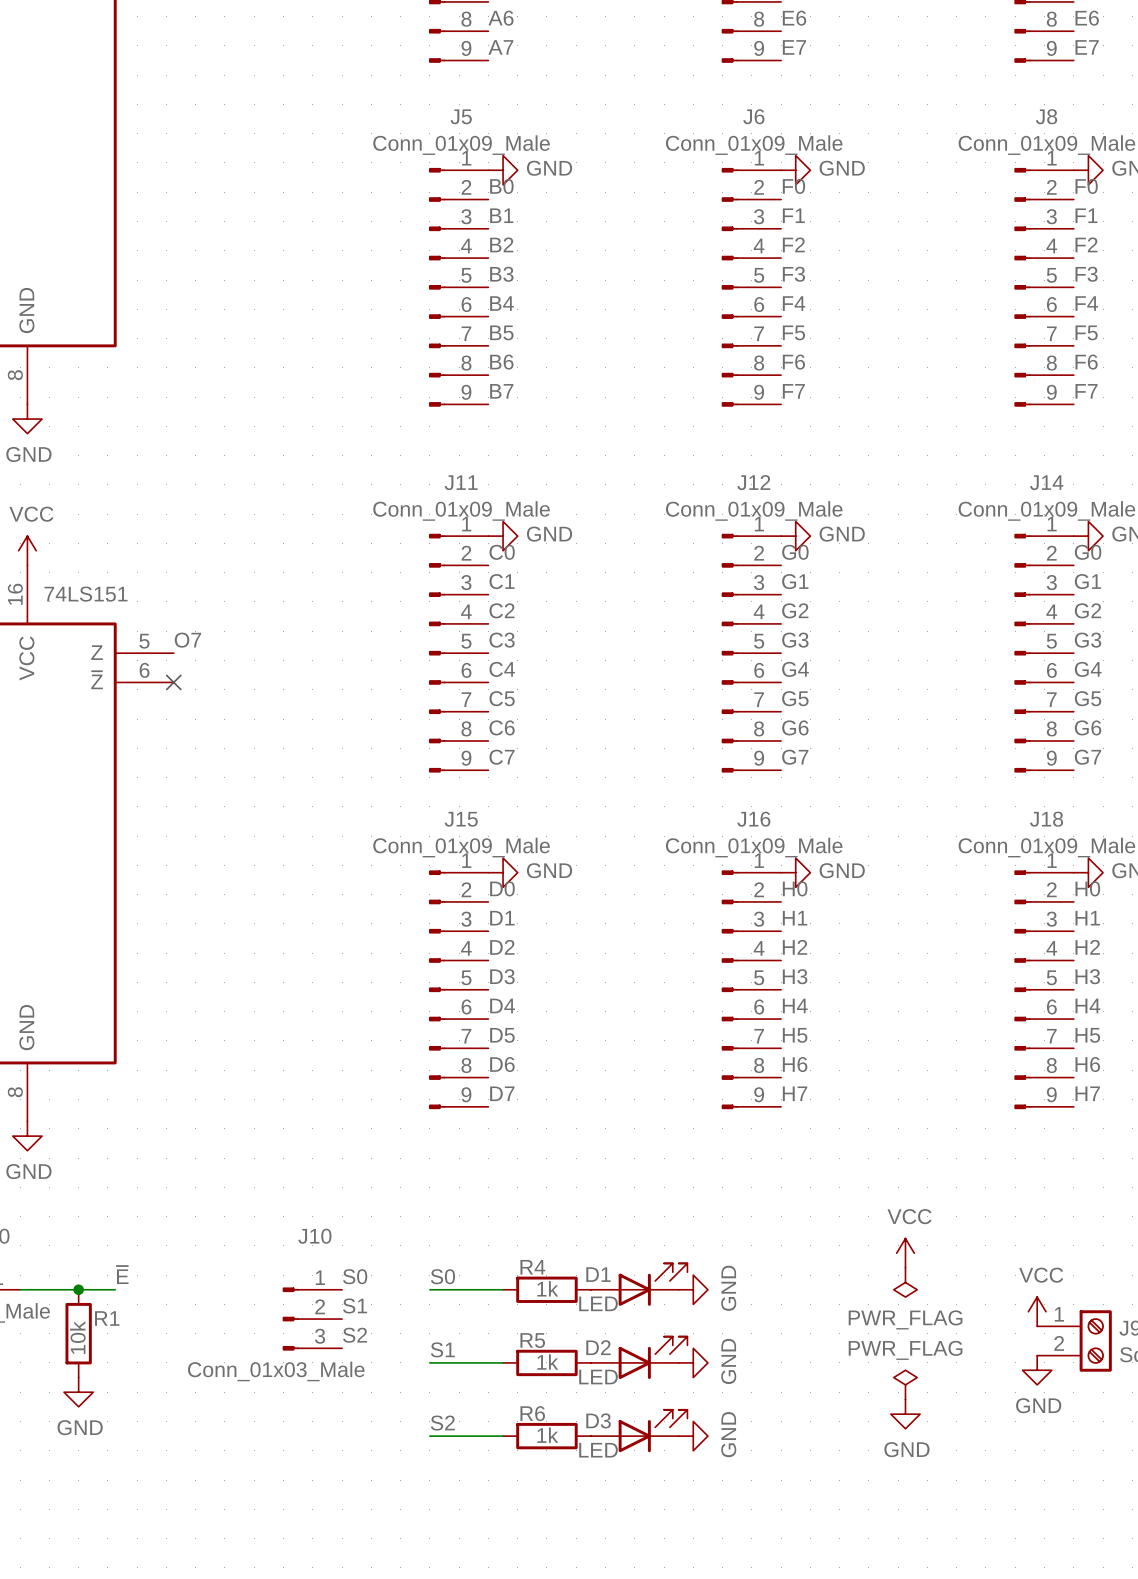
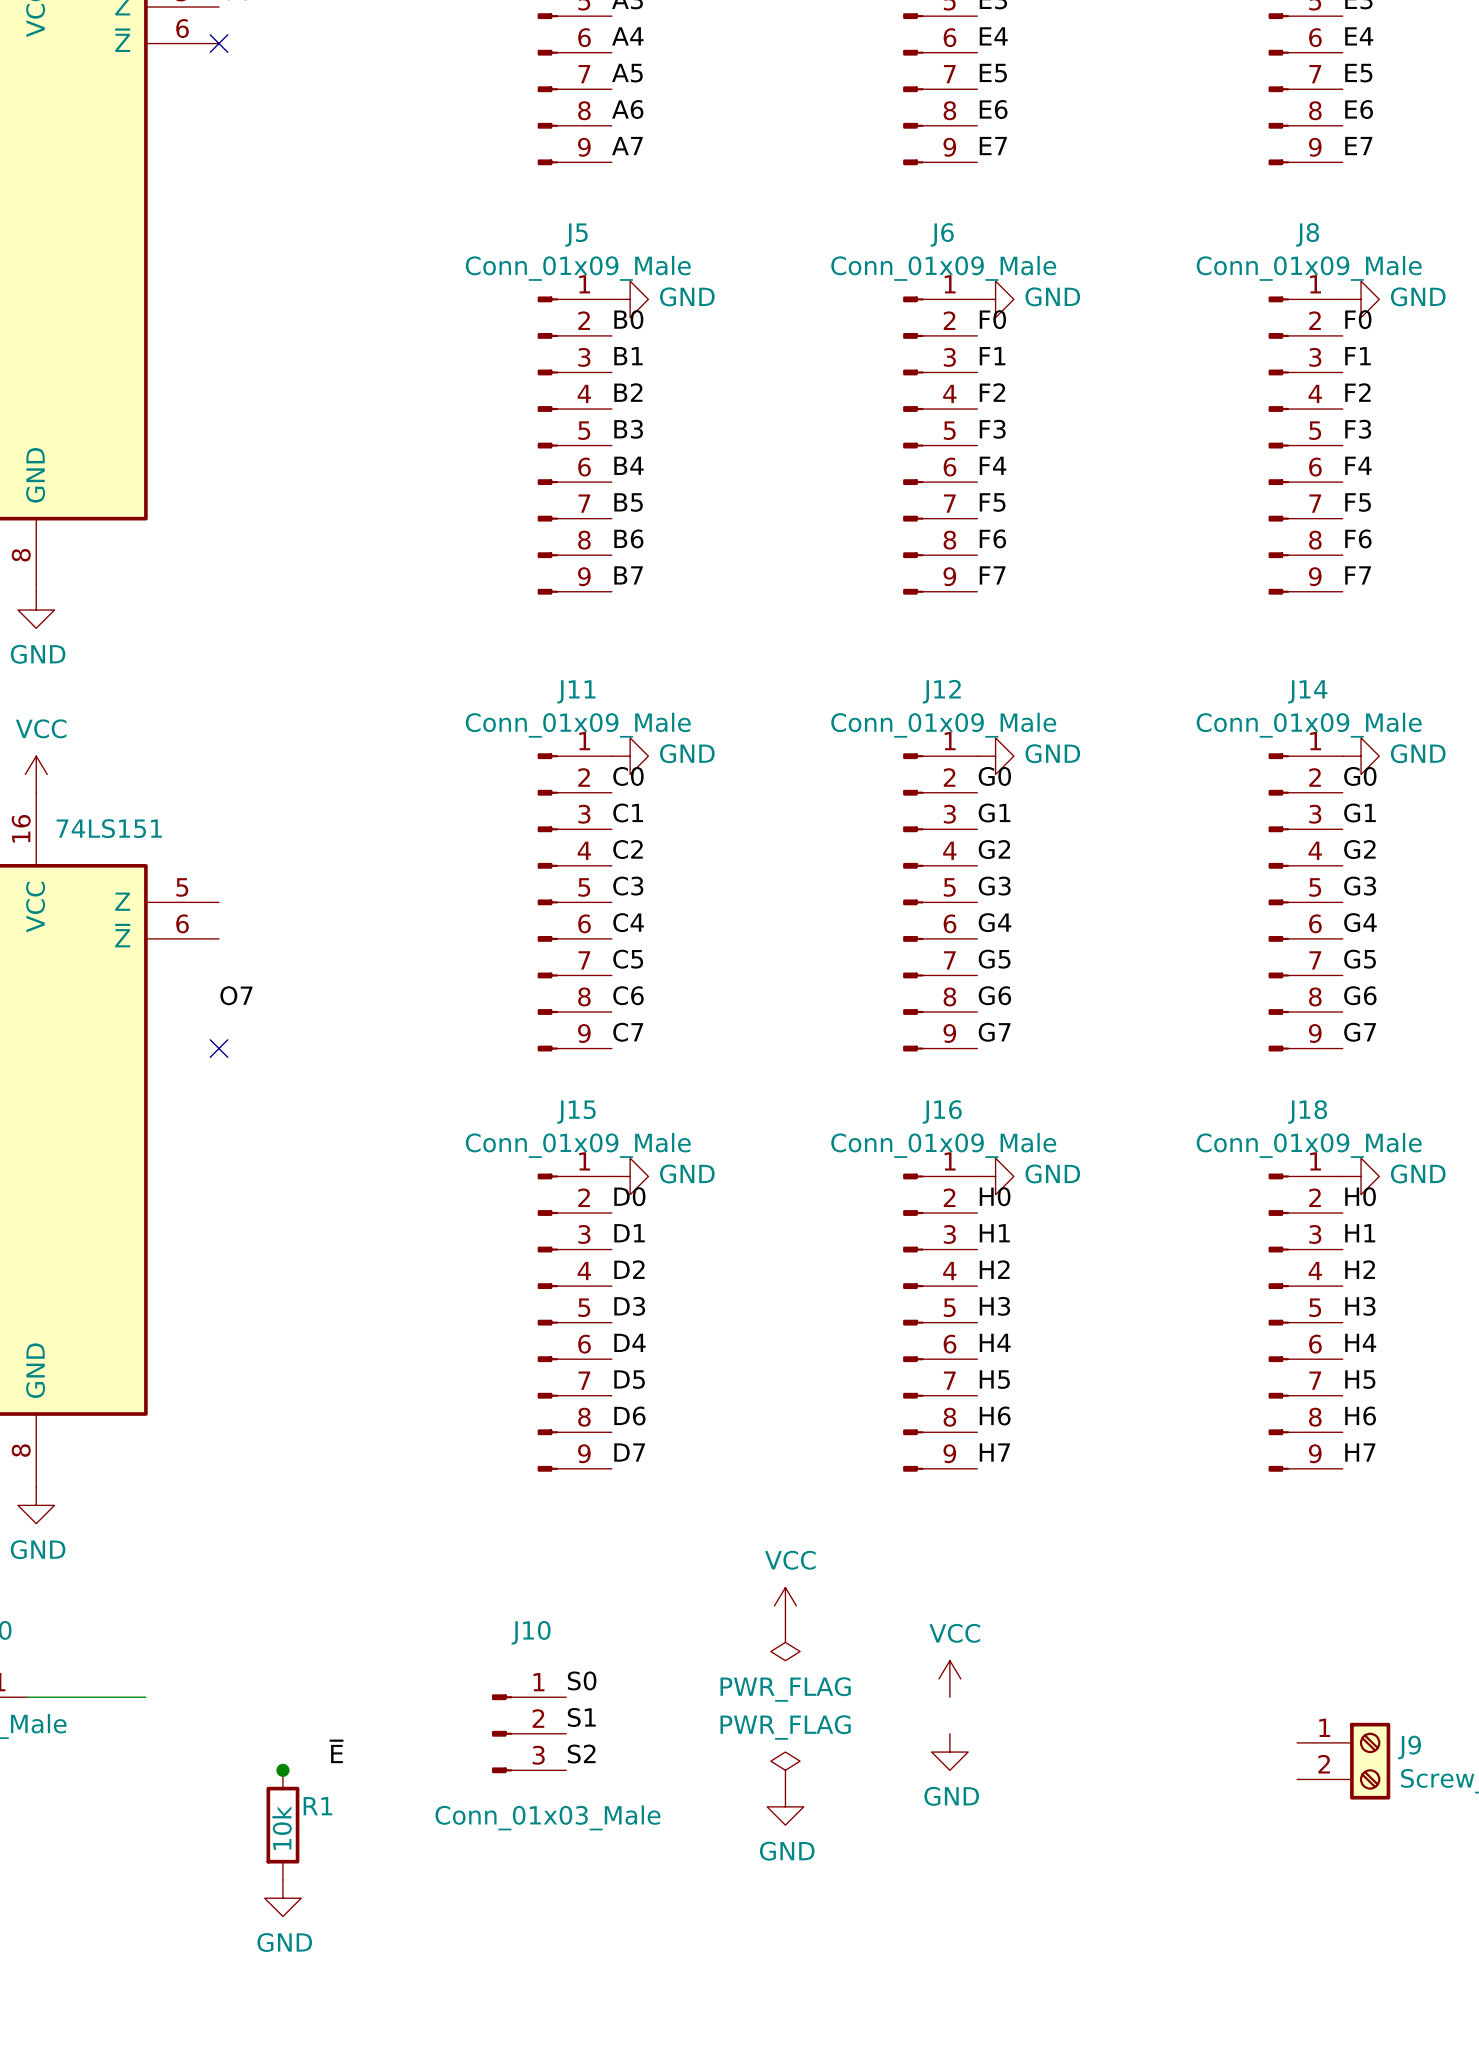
label position: O7 (187, 640) -> O7 (236, 995)
no-connect mark: (173, 682) -> none
no-connect mark: none -> (218, 1048)
power symbol: none -> VCC (785, 1605)
power symbol: none -> PWR_FLAG (785, 1642)
power symbol: VCC (905, 1253) -> none
label position: ~{E} (122, 1275) -> ~{E} (336, 1751)
power symbol: none -> VCC (949, 1678)
label: S0 (355, 1276) -> none
label position: S0 (442, 1276) -> S0 (582, 1680)
power symbol: PWR_FLAG (905, 1282) -> none
D1: LED (639, 1284) -> none
junction: (78, 1289) -> none
wire: (429, 1289) (503, 1289) -> none
R4: 1k (546, 1289) -> none
power symbol: GND (693, 1289) -> none
label: S1 (355, 1305) -> none
power symbol: VCC (1037, 1311) -> none
J10 position: (312, 1319) -> (529, 1733)
R1 position: (78, 1333) -> (282, 1825)
power symbol: none -> GND (949, 1752)
label: S2 (355, 1335) -> none
label: none -> S2 (581, 1754)
junction: none -> (282, 1770)
power symbol: none -> PWR_FLAG (785, 1770)
label position: S1 (442, 1349) -> S1 (581, 1717)
D2: LED (639, 1357) -> none
wire: (429, 1362) (503, 1362) -> none
R5: 1k (546, 1362) -> none
power symbol: GND (693, 1362) -> none
power symbol: GND (1037, 1370) -> none
J10 value position: Conn_01x03_Male (276, 1371) -> Conn_01x03_Male (547, 1817)
power symbol: none -> GND (785, 1806)
power symbol: PWR_FLAG (905, 1384) -> none
power symbol position: GND (78, 1392) -> GND (282, 1898)
power symbol: GND (905, 1414) -> none
label: S2 (442, 1423) -> none
D3: LED (639, 1430) -> none
wire: (429, 1436) (503, 1436) -> none
R6: 1k (546, 1436) -> none
power symbol: GND (693, 1436) -> none

